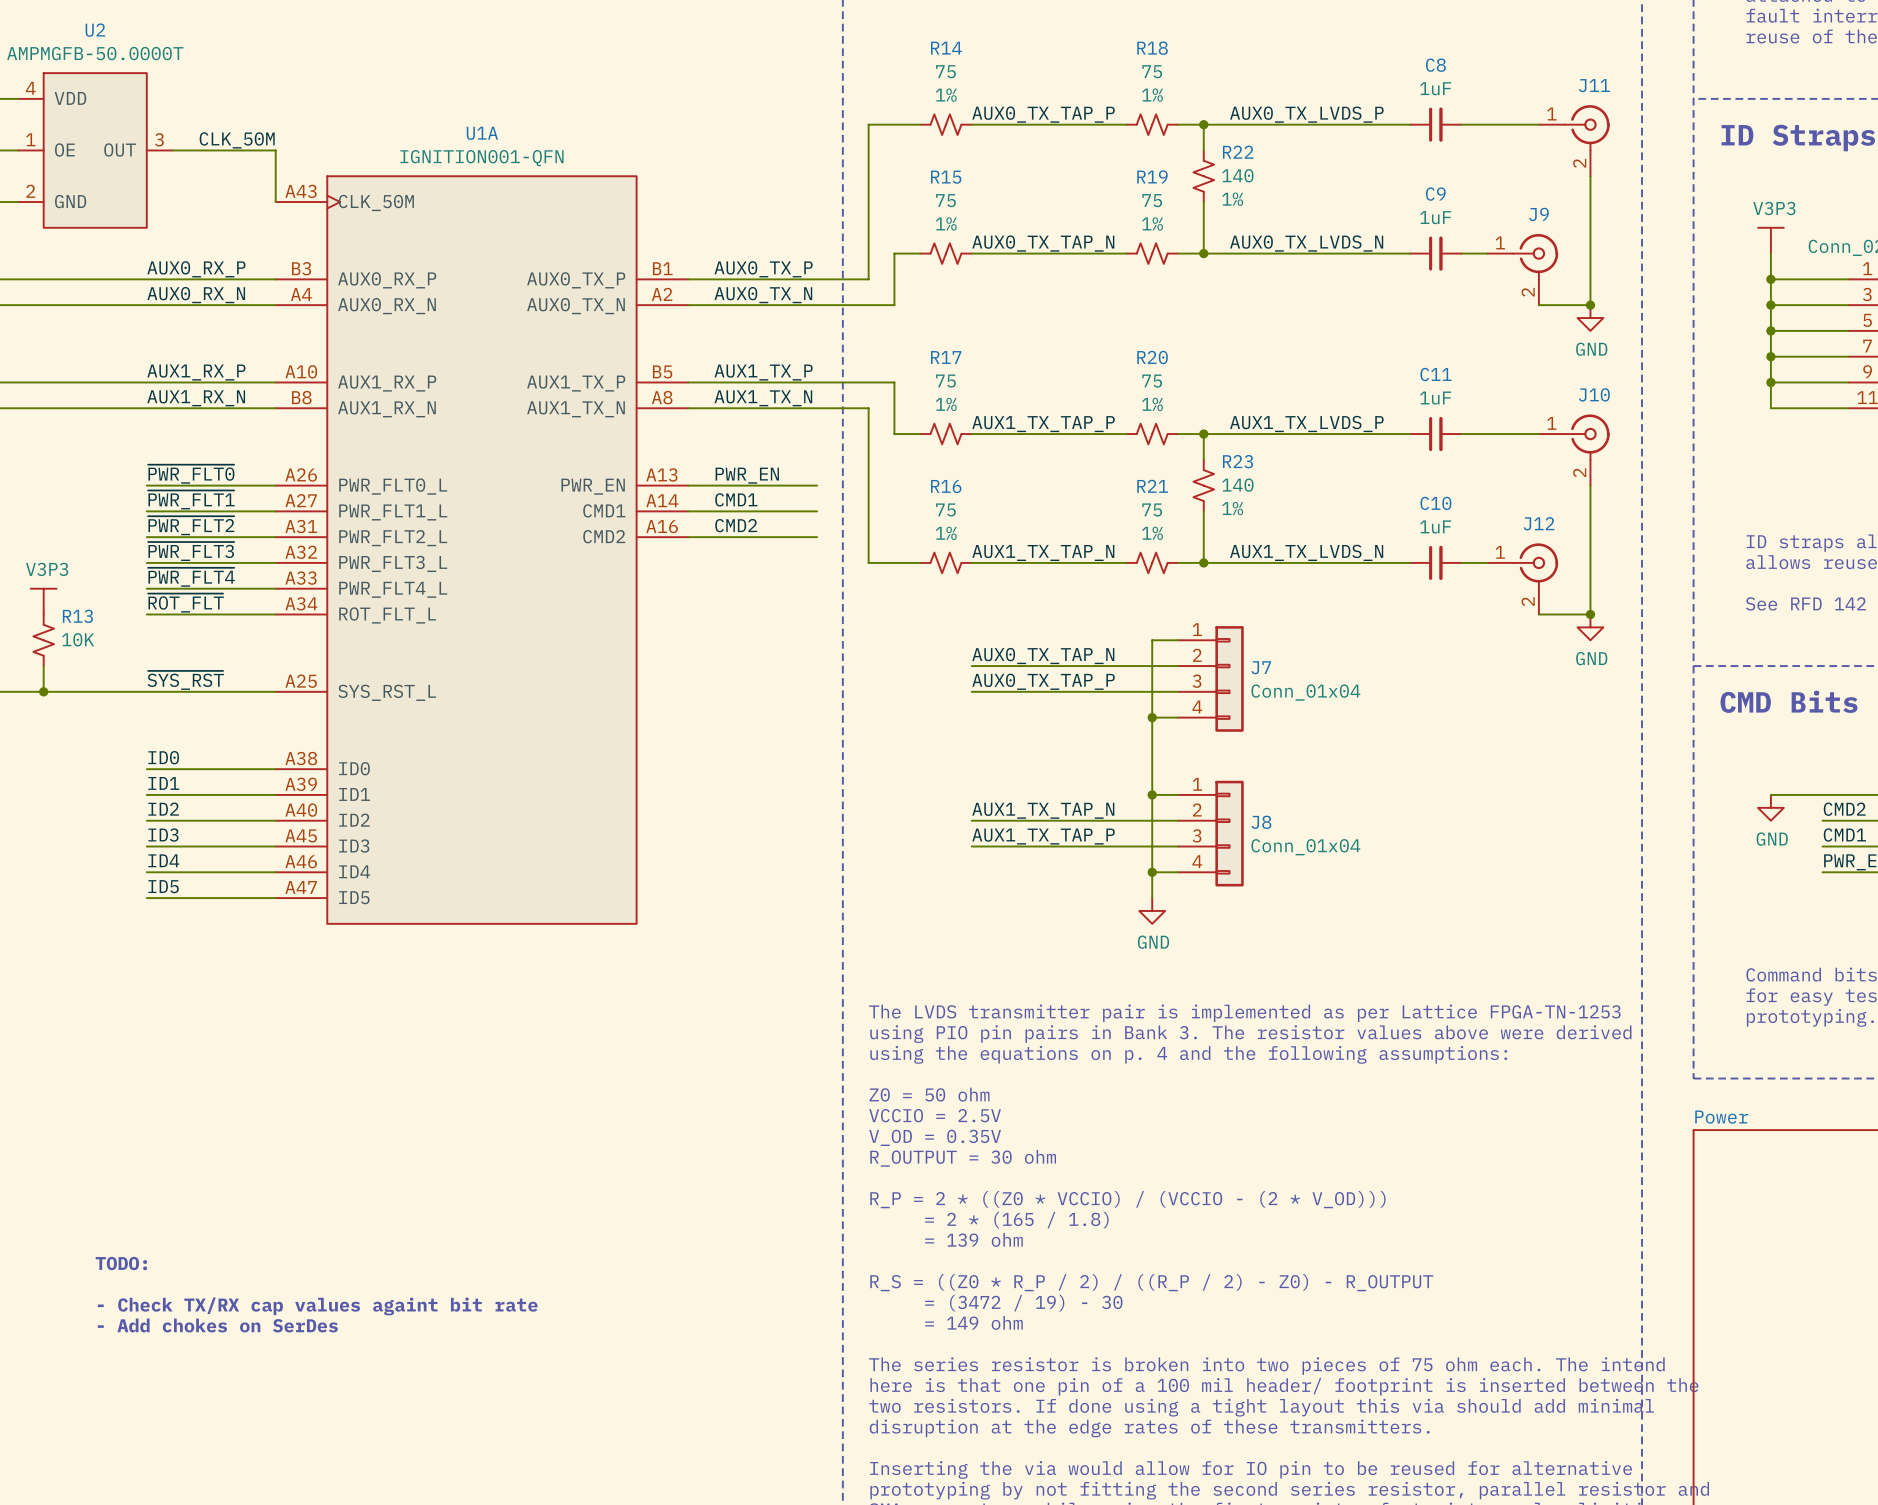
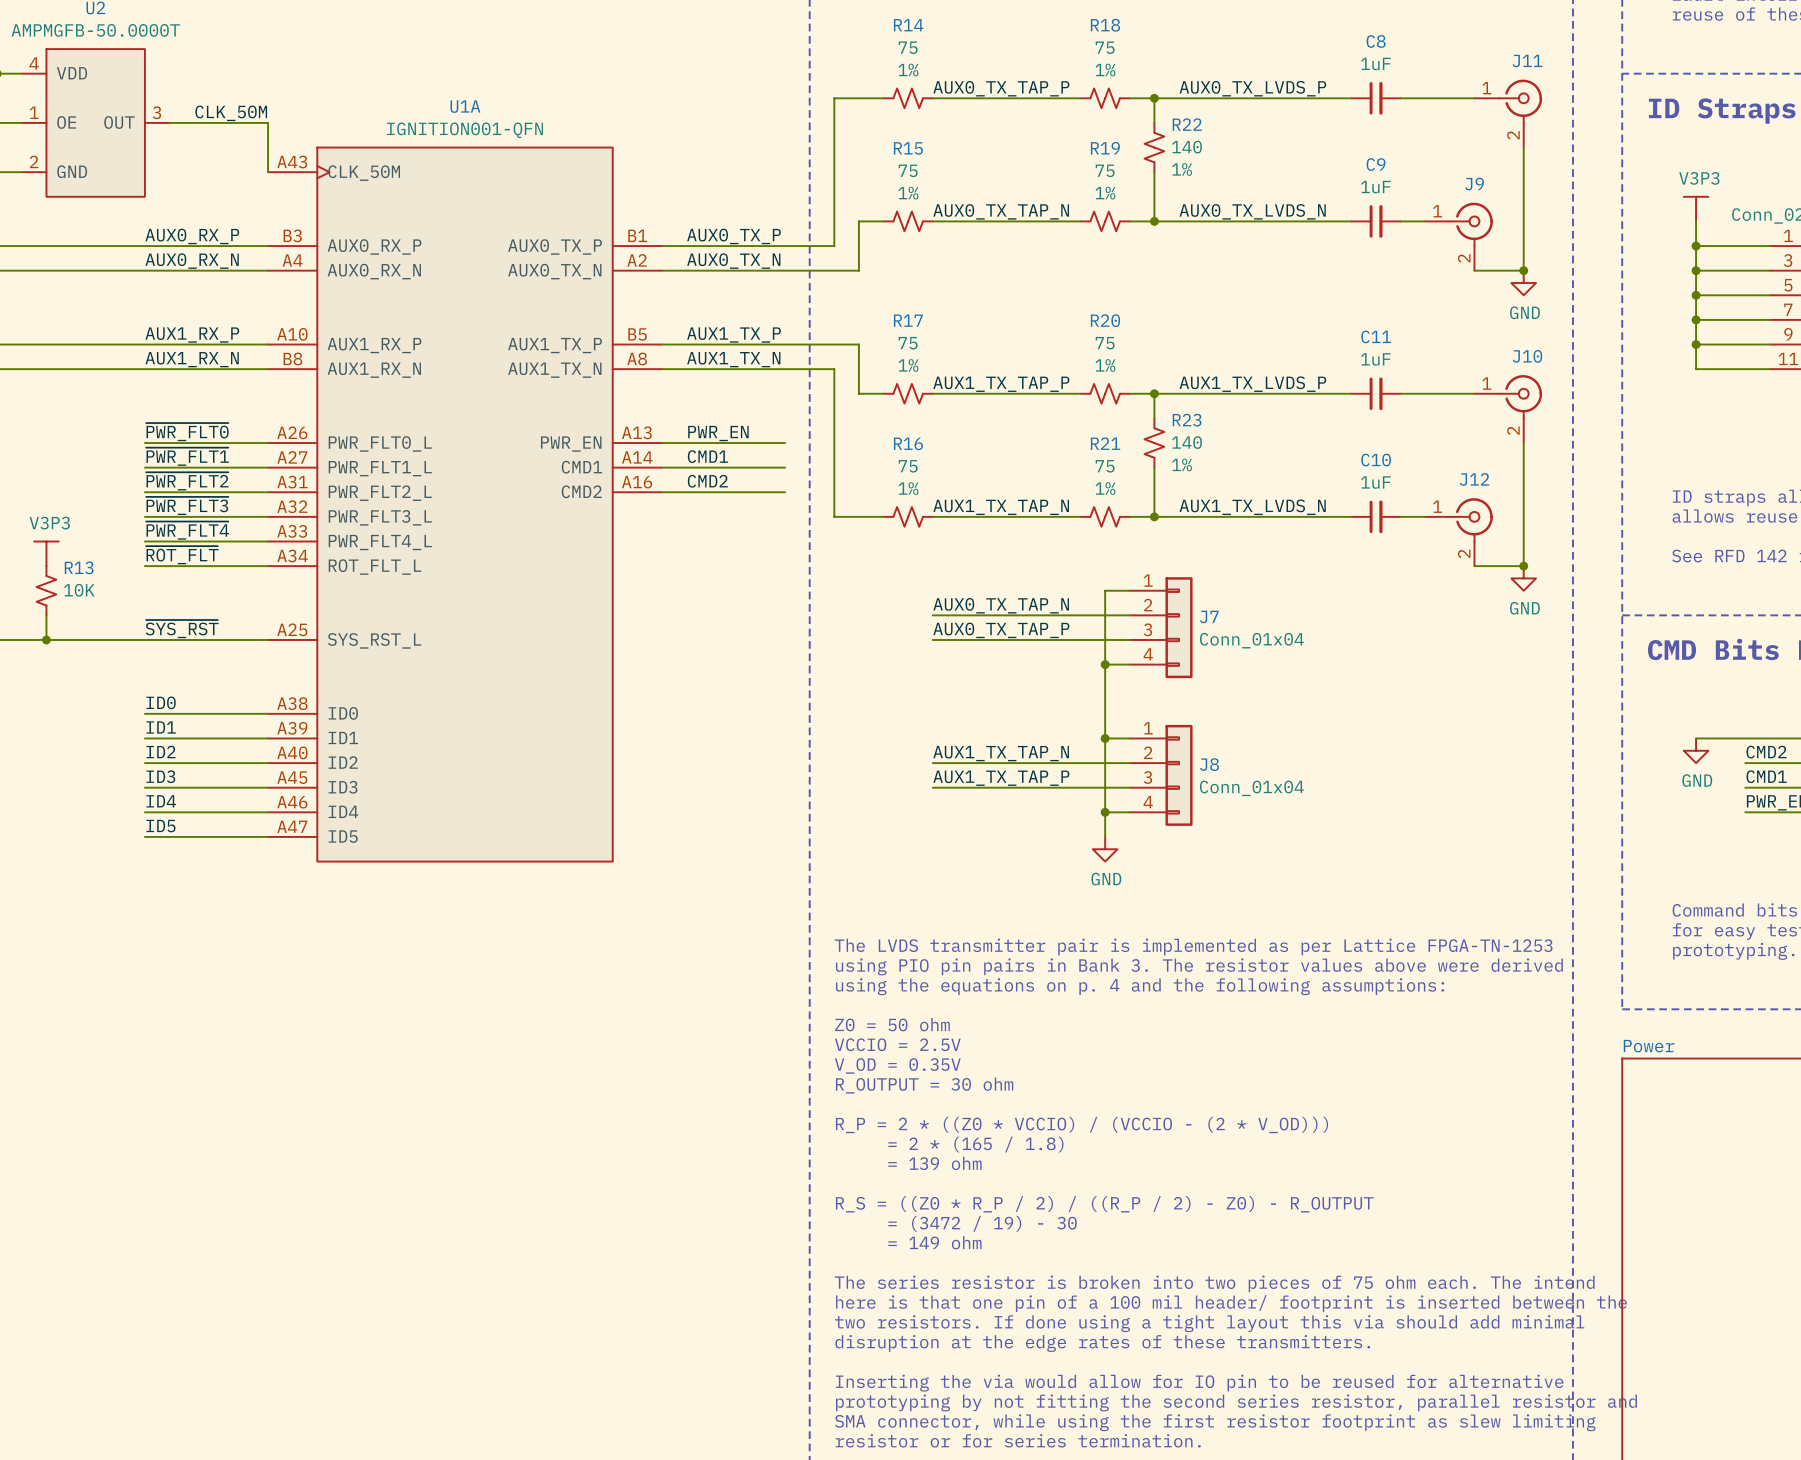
text: TODO: (121, 1263) -> none
text: - Check TX/RX cap values againt bit rate (317, 1306) -> none
text: - Add chokes on SerDes (217, 1325) -> none

